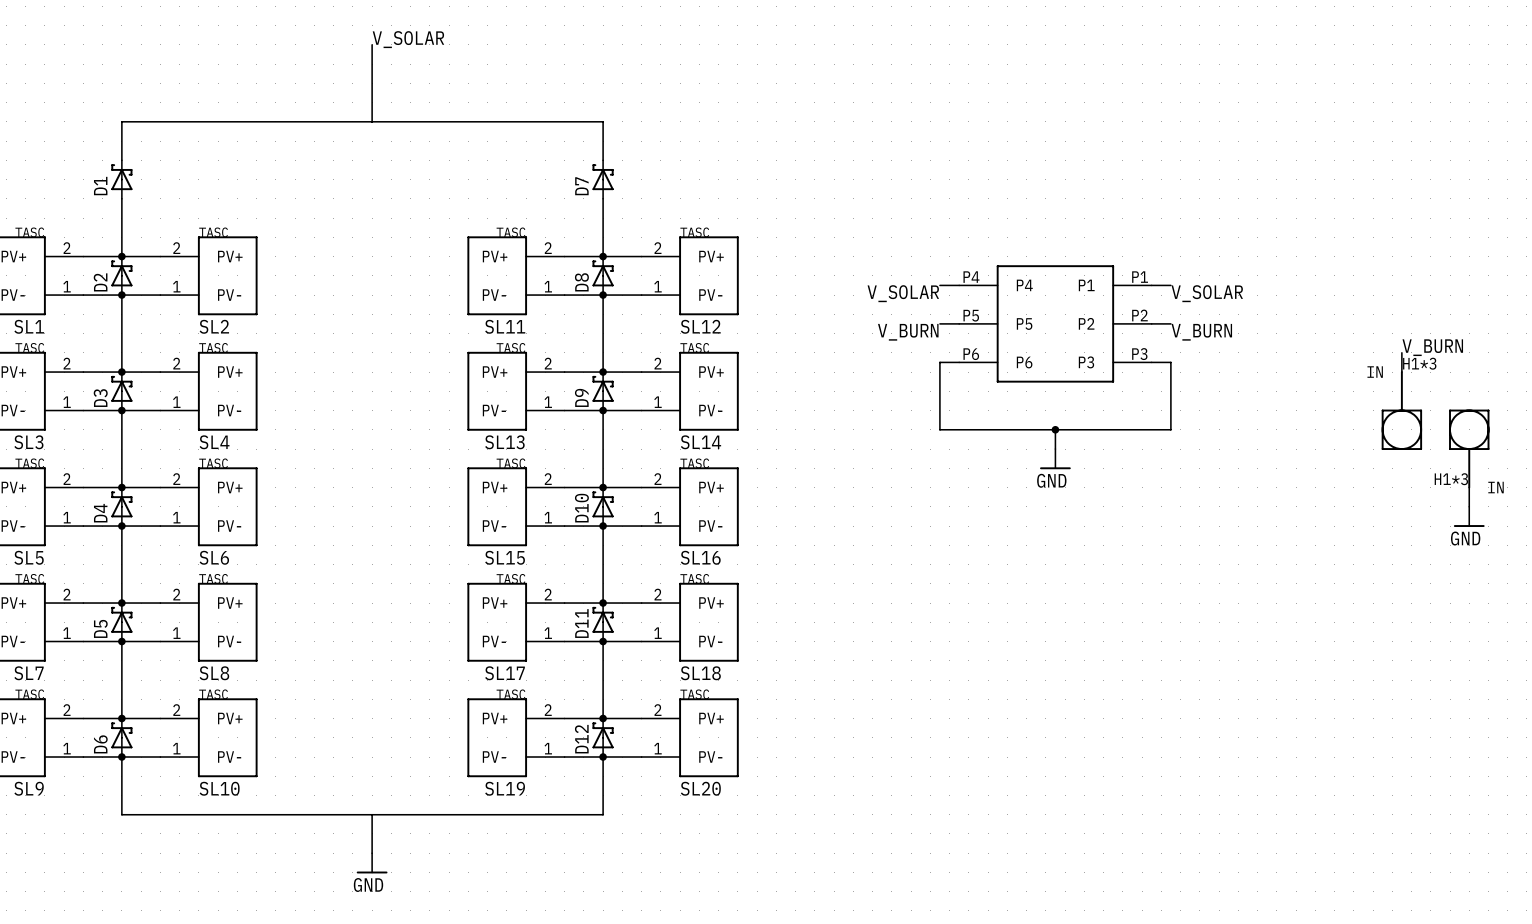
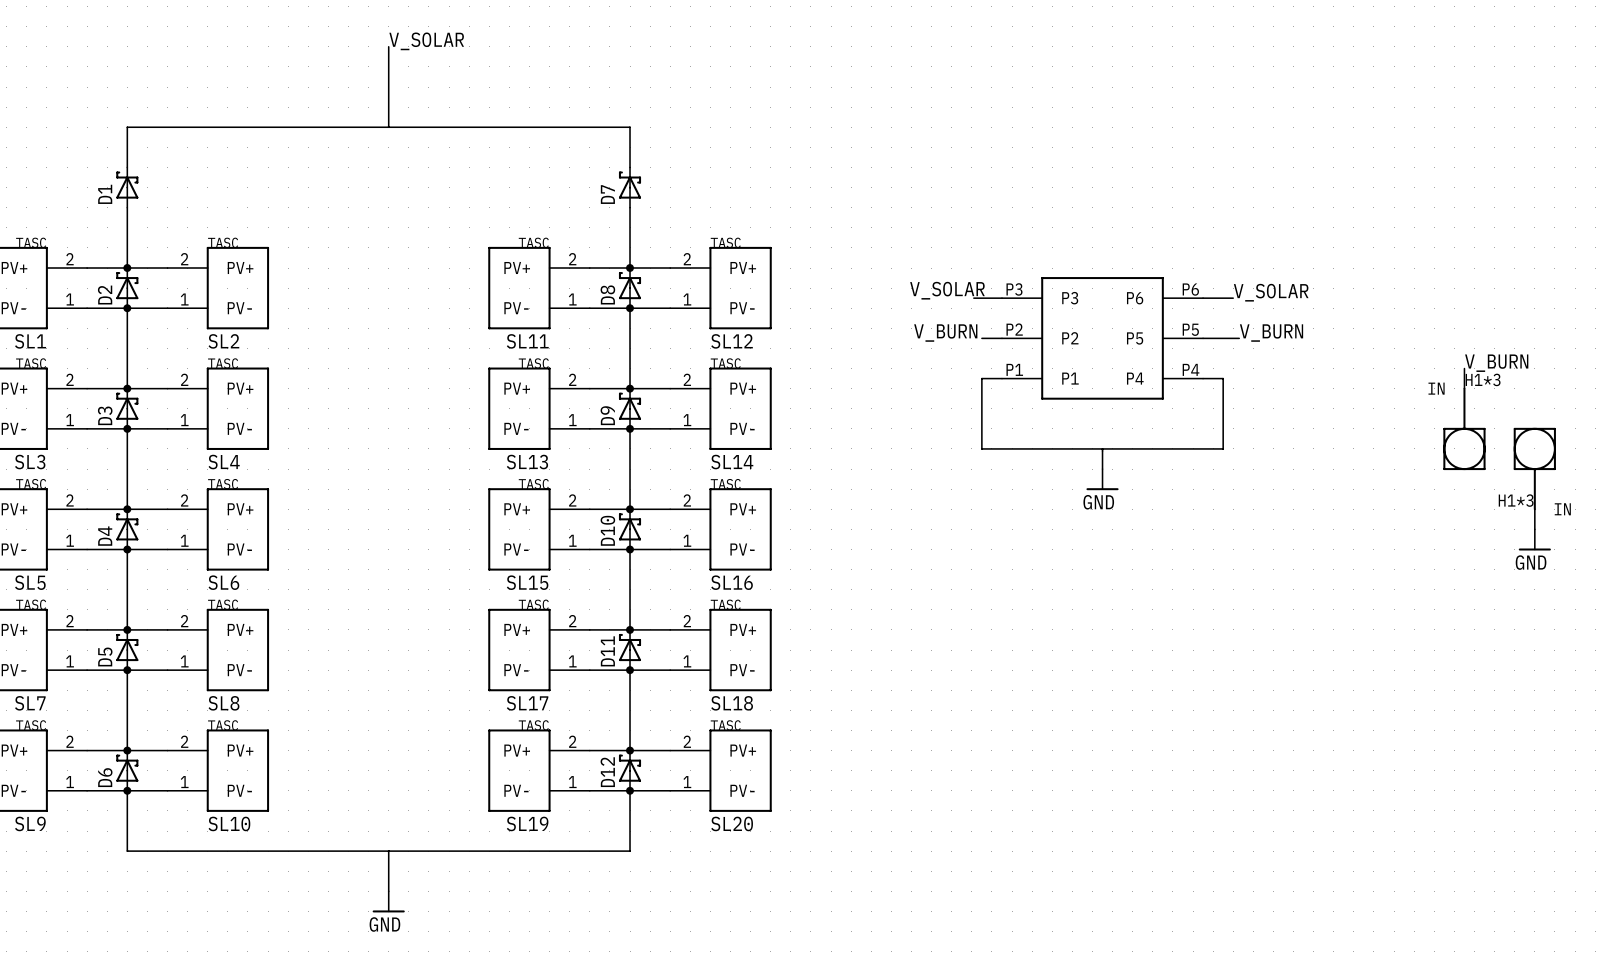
wire: none -> (973, 298) (981, 298)
wire: none -> (1223, 298) (1233, 298)
label position: V_SOLAR (903, 293) -> V_SOLAR (947, 290)
label position: V_SOLAR (1207, 293) -> V_SOLAR (1271, 292)
part rotation: 0° (1055, 323) -> 180° (1102, 338)
wire: none -> (1223, 338) (1239, 338)
label position: V_BURN (908, 332) -> V_BURN (945, 333)
label position: V_BURN (1201, 332) -> V_BURN (1271, 333)
junction: (1055, 429) -> none

